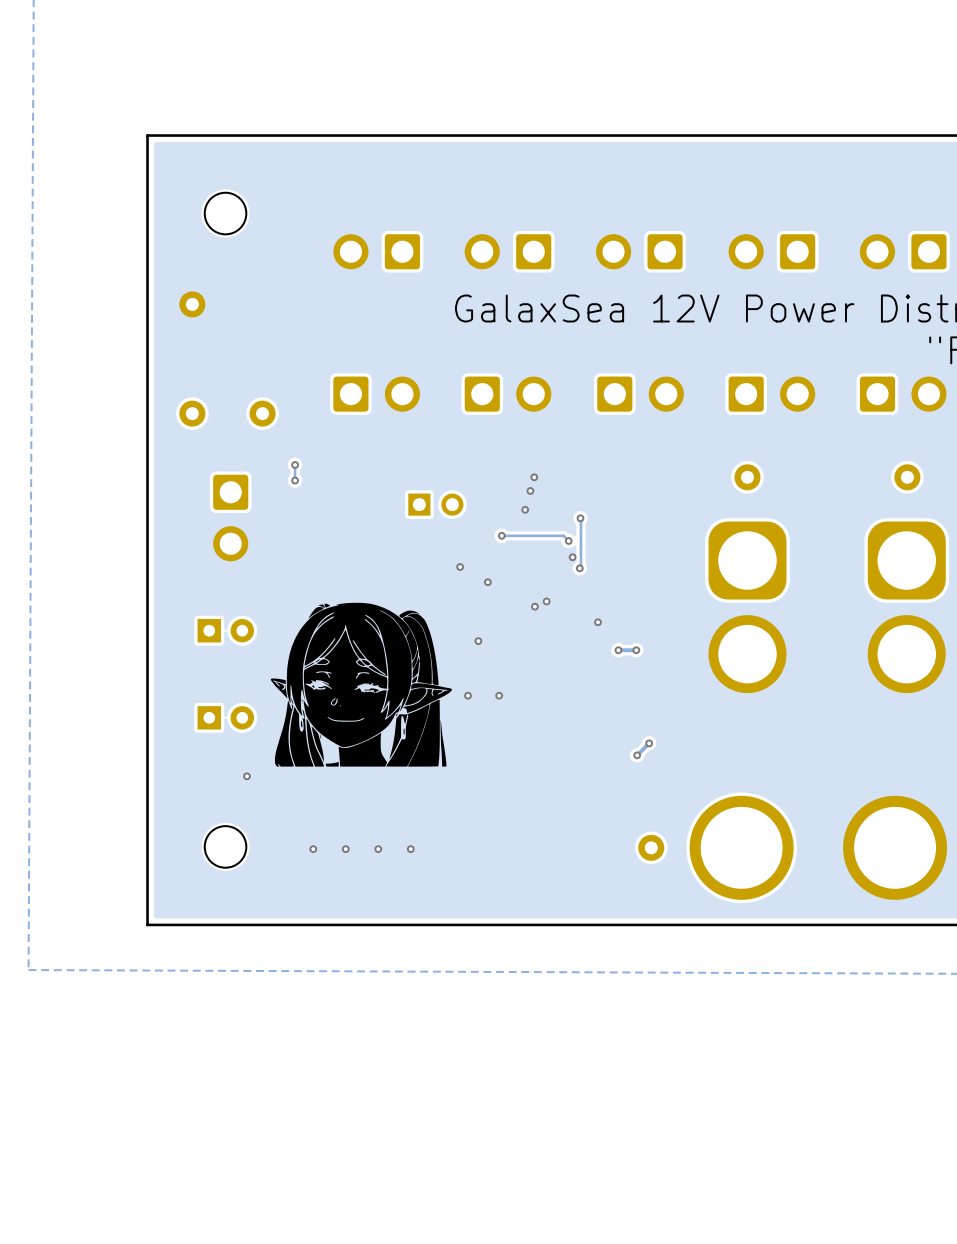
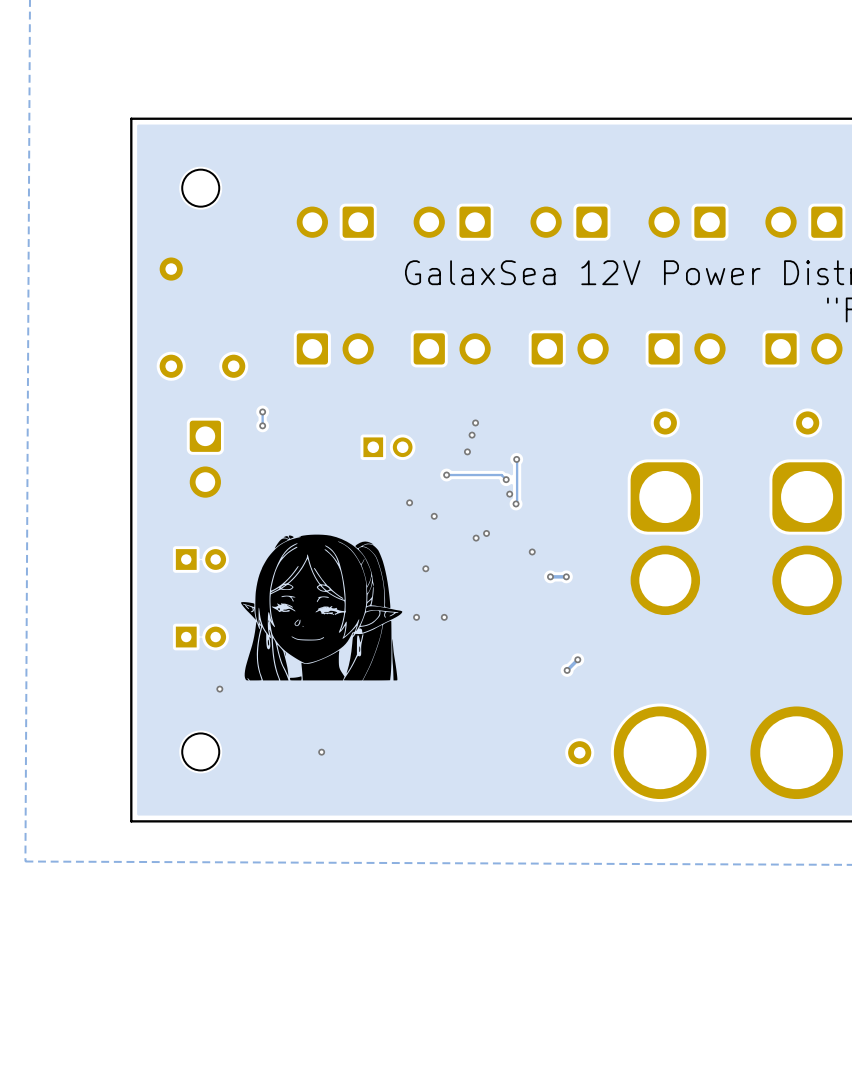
via: none -> (321, 752)
via: (313, 849) -> none
via: (345, 849) -> none
via: (378, 849) -> none
via: (410, 849) -> none

